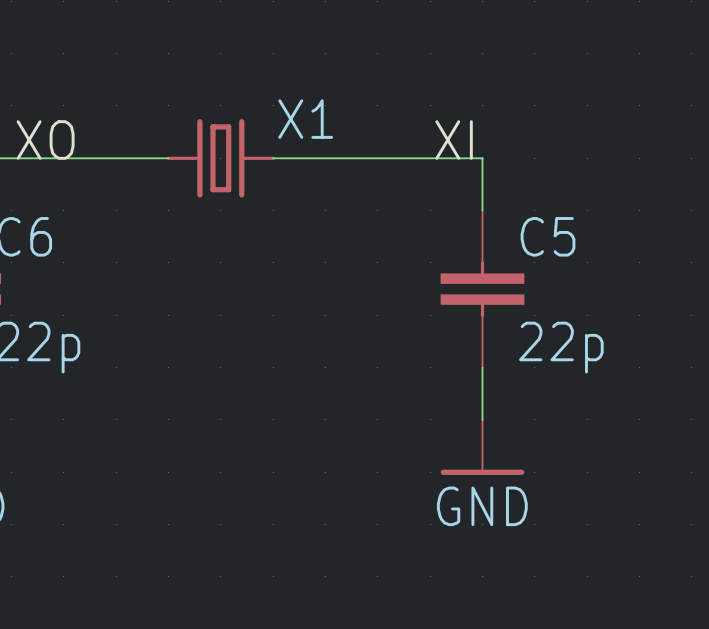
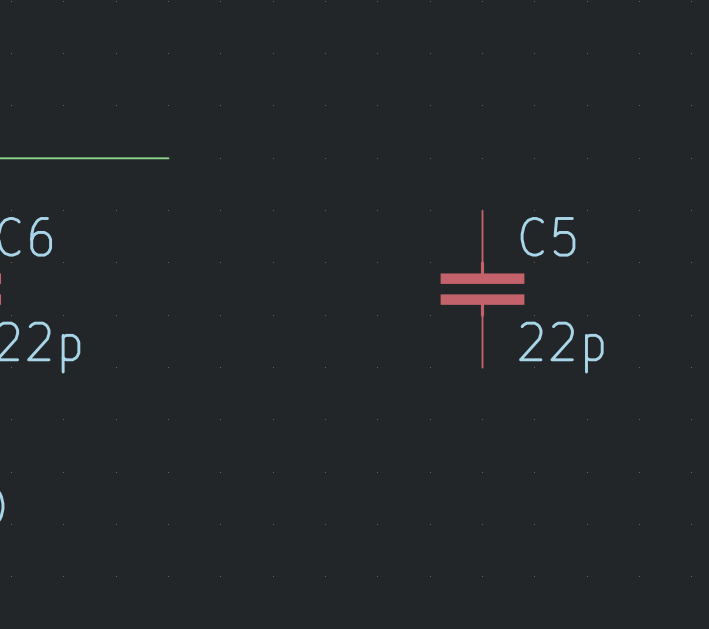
label: XO (45, 139) -> none
label: XI (454, 139) -> none
X1: (220, 158) -> none
wire: (273, 158) (482, 158) (482, 210) -> none
wire: (482, 367) (482, 419) -> none
power symbol: GND (482, 447) -> none

